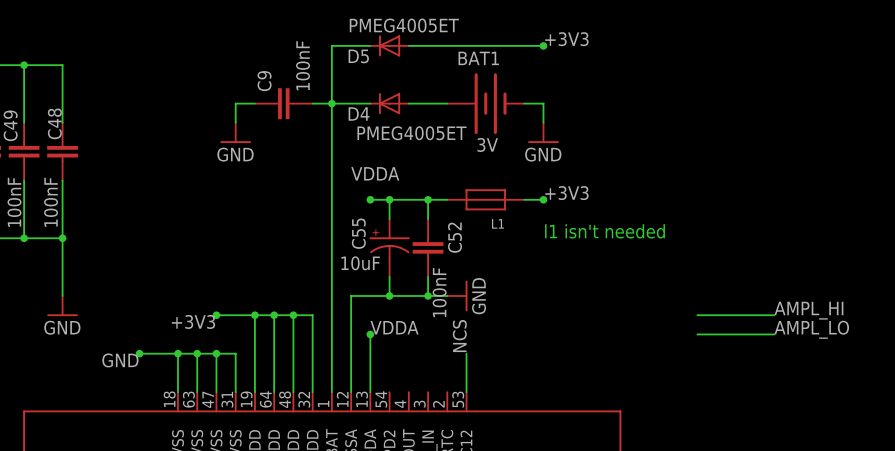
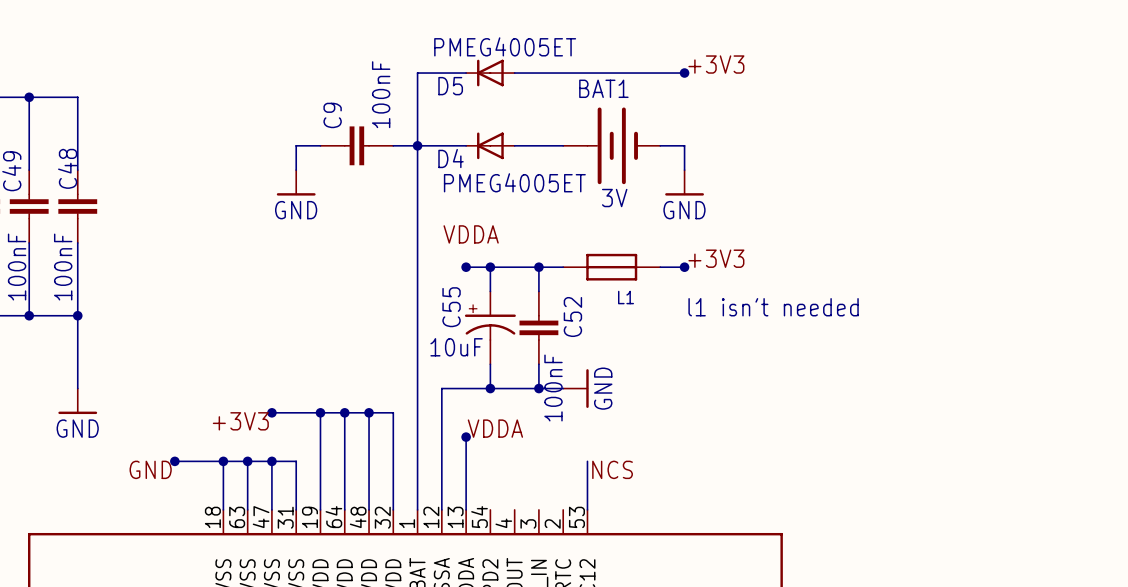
label: AMPL_HI (808, 310) -> none
wire: (697, 315) (774, 315) -> none
label: AMPL_LO (811, 329) -> none
wire: (697, 334) (774, 334) -> none
label rotation: 0° (459, 336) -> 90° clockwise (612, 469)

